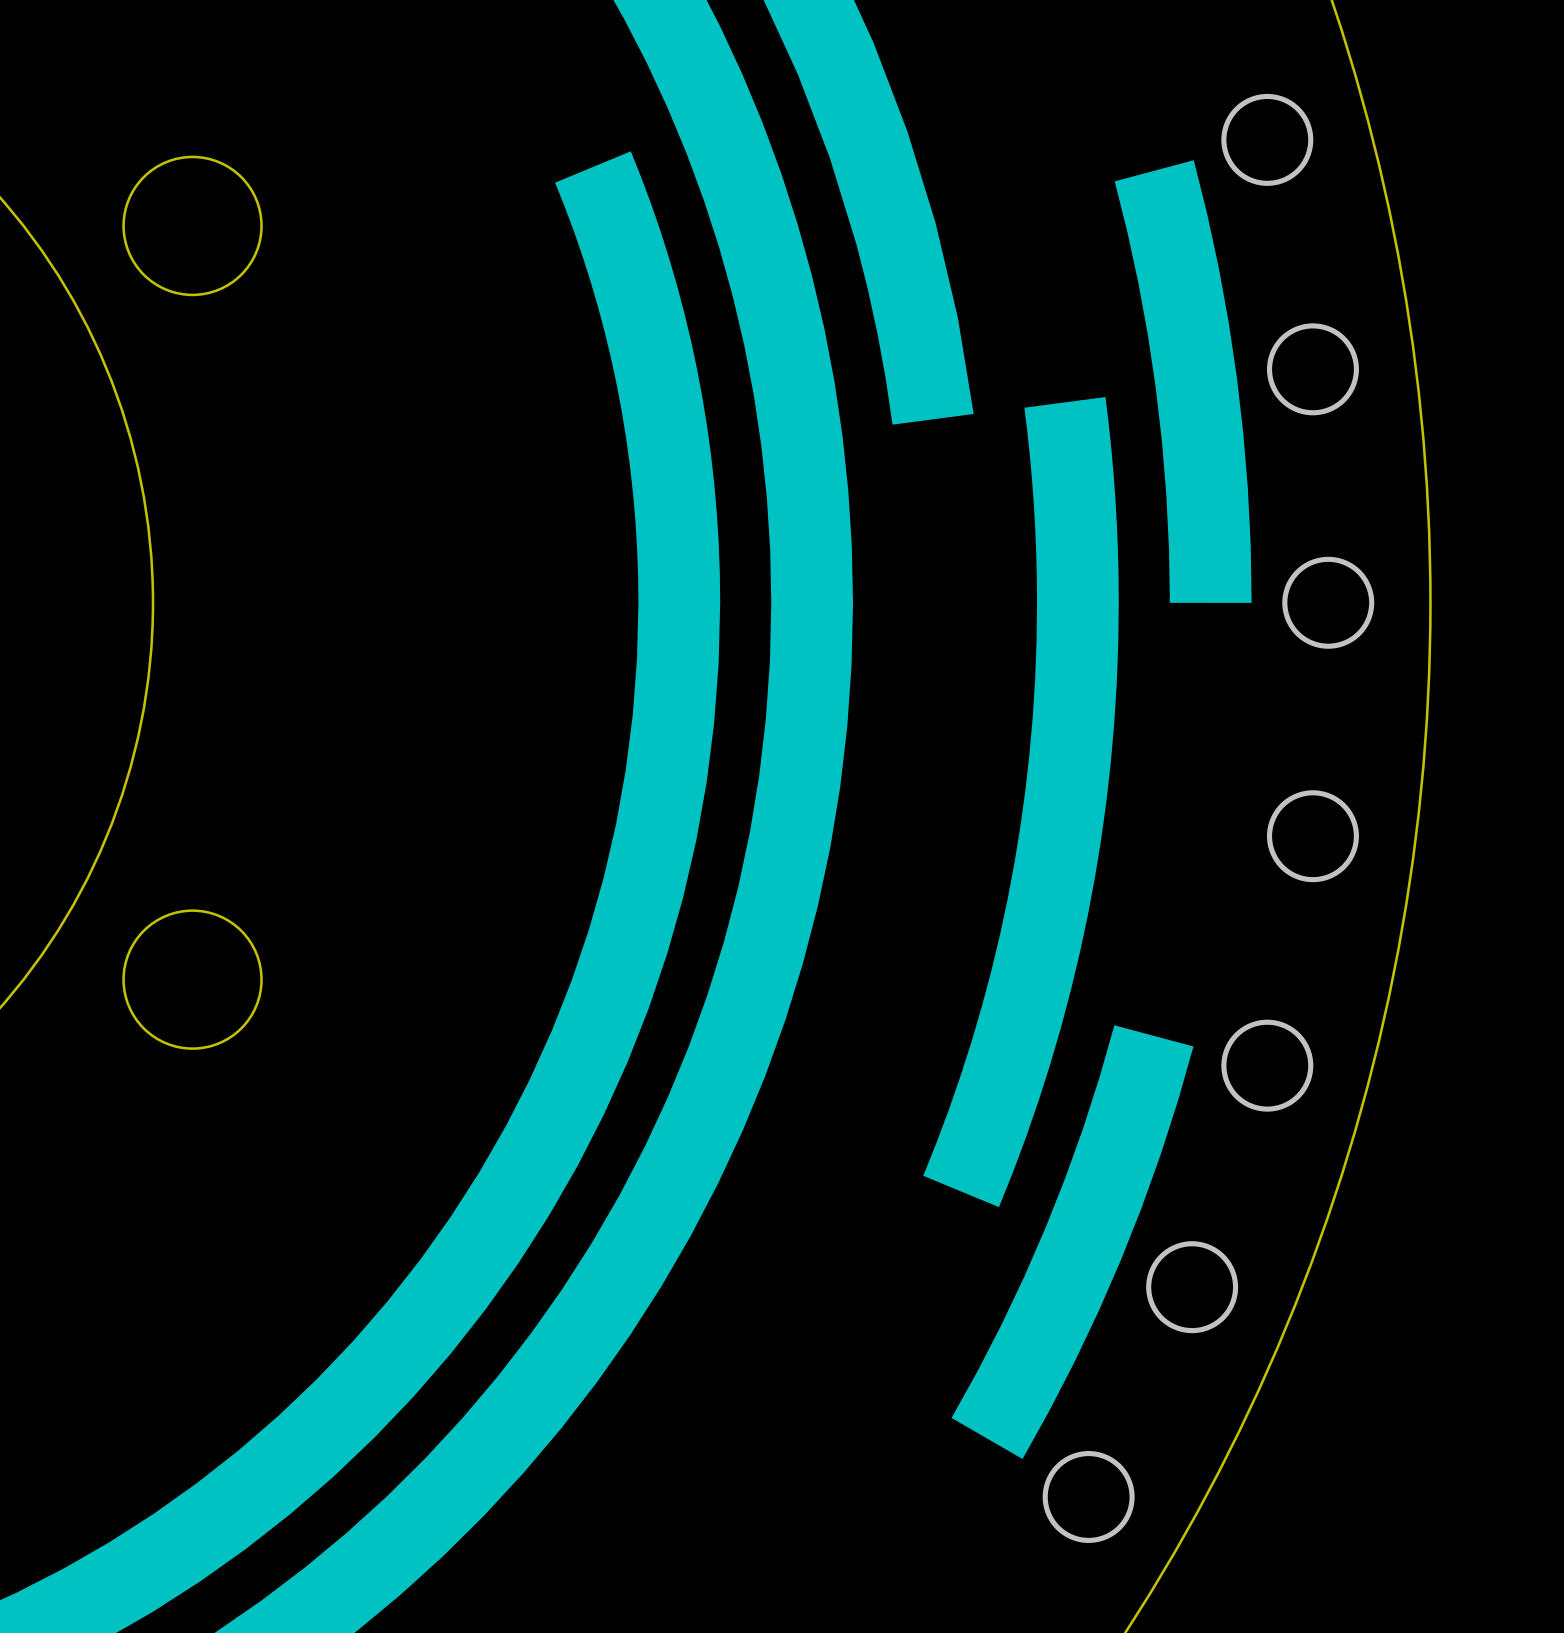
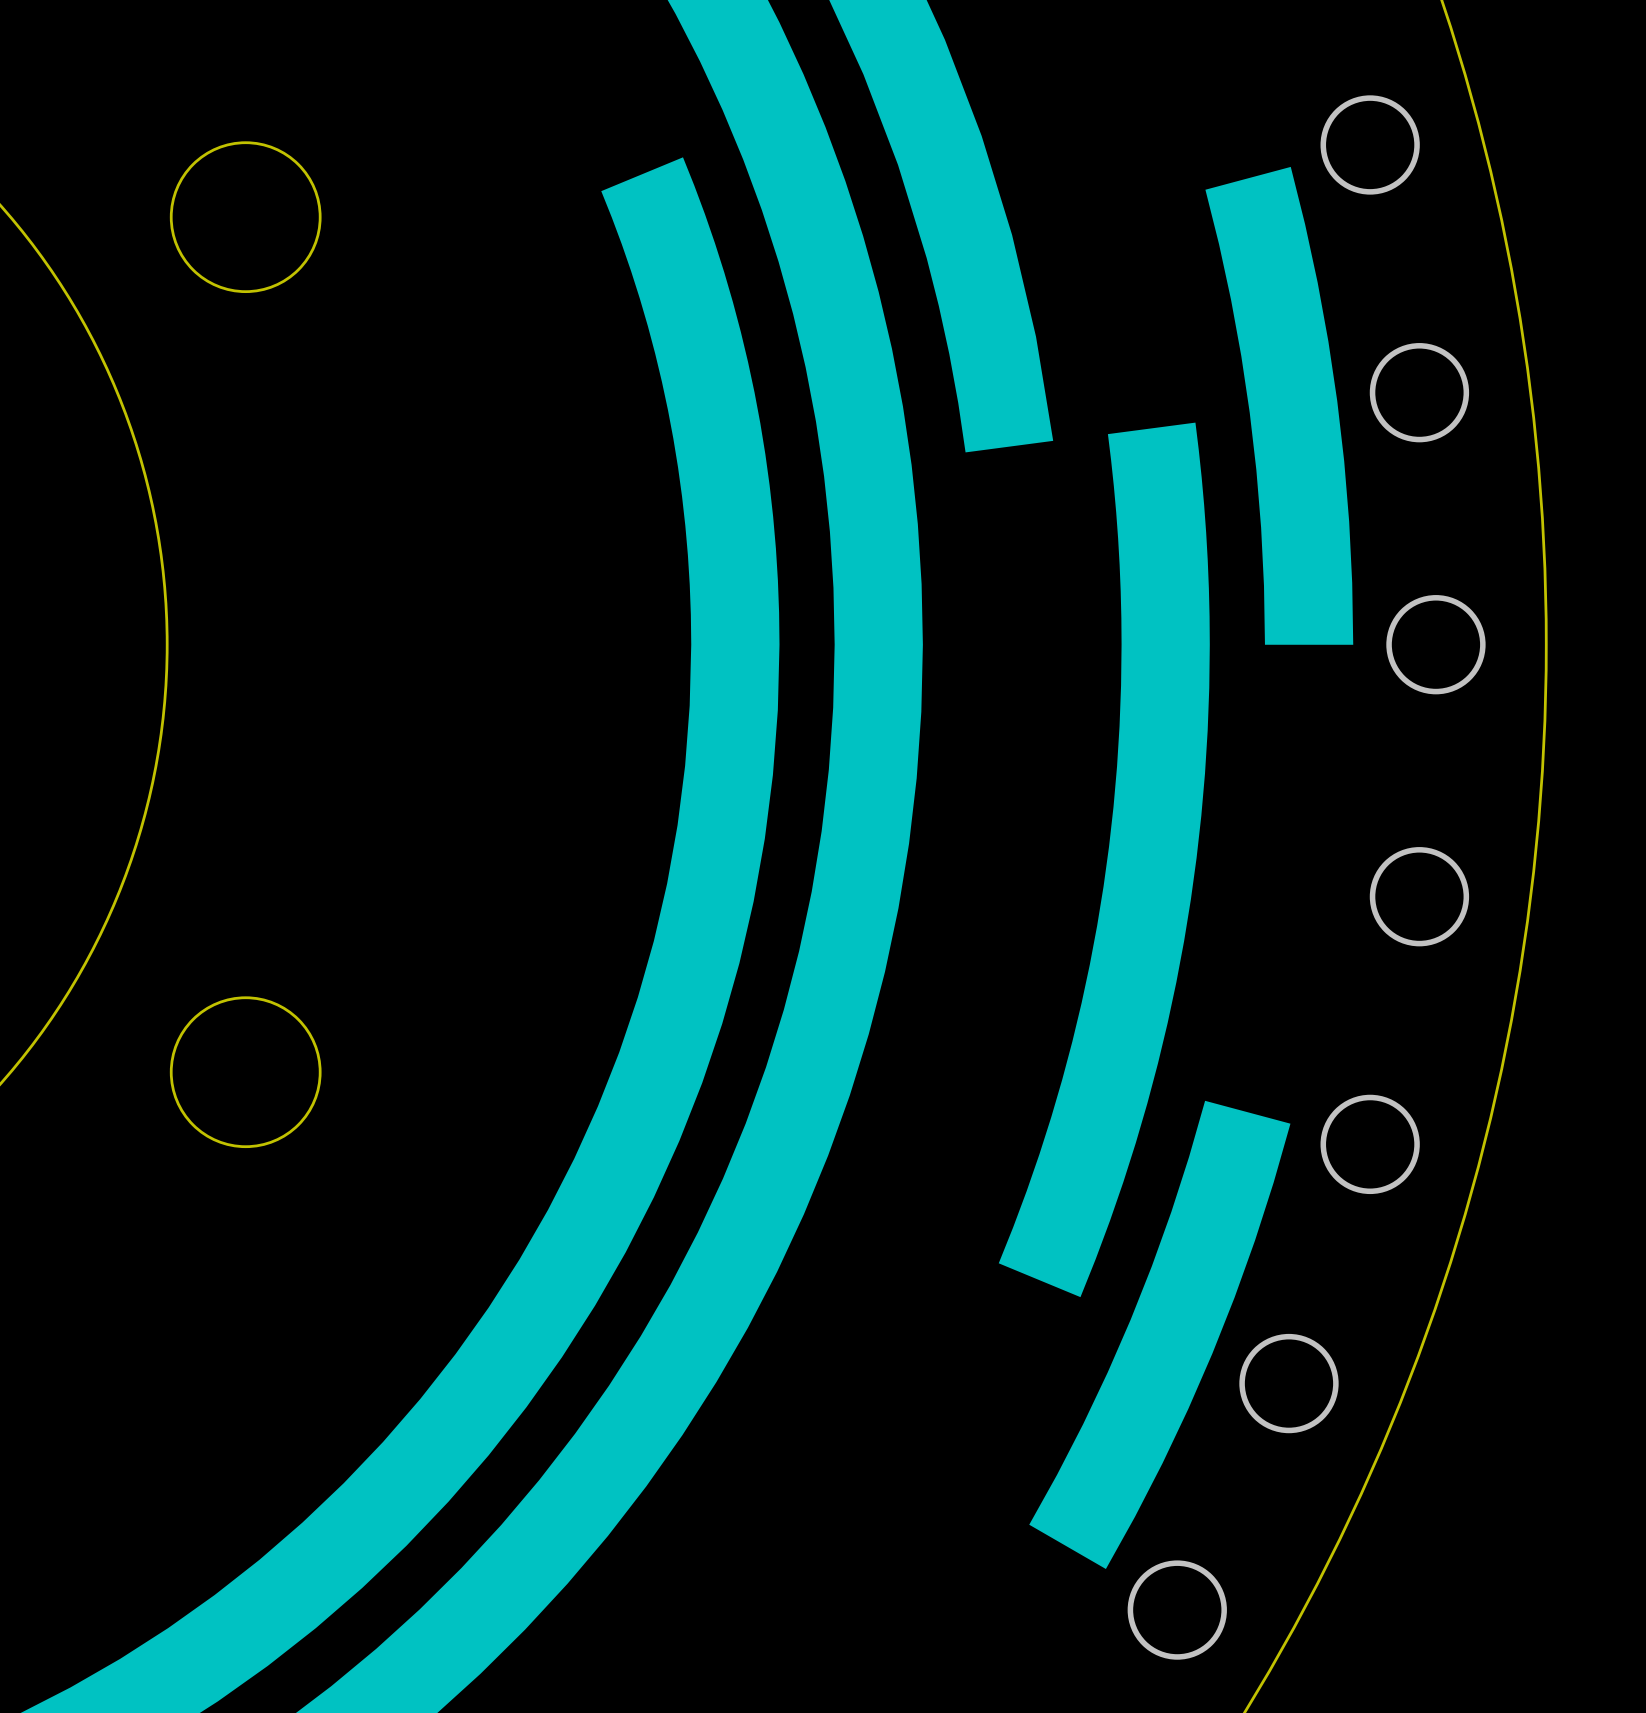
round board edge position: (192, 225) -> (245, 217)
round board edge position: (192, 979) -> (245, 1072)

